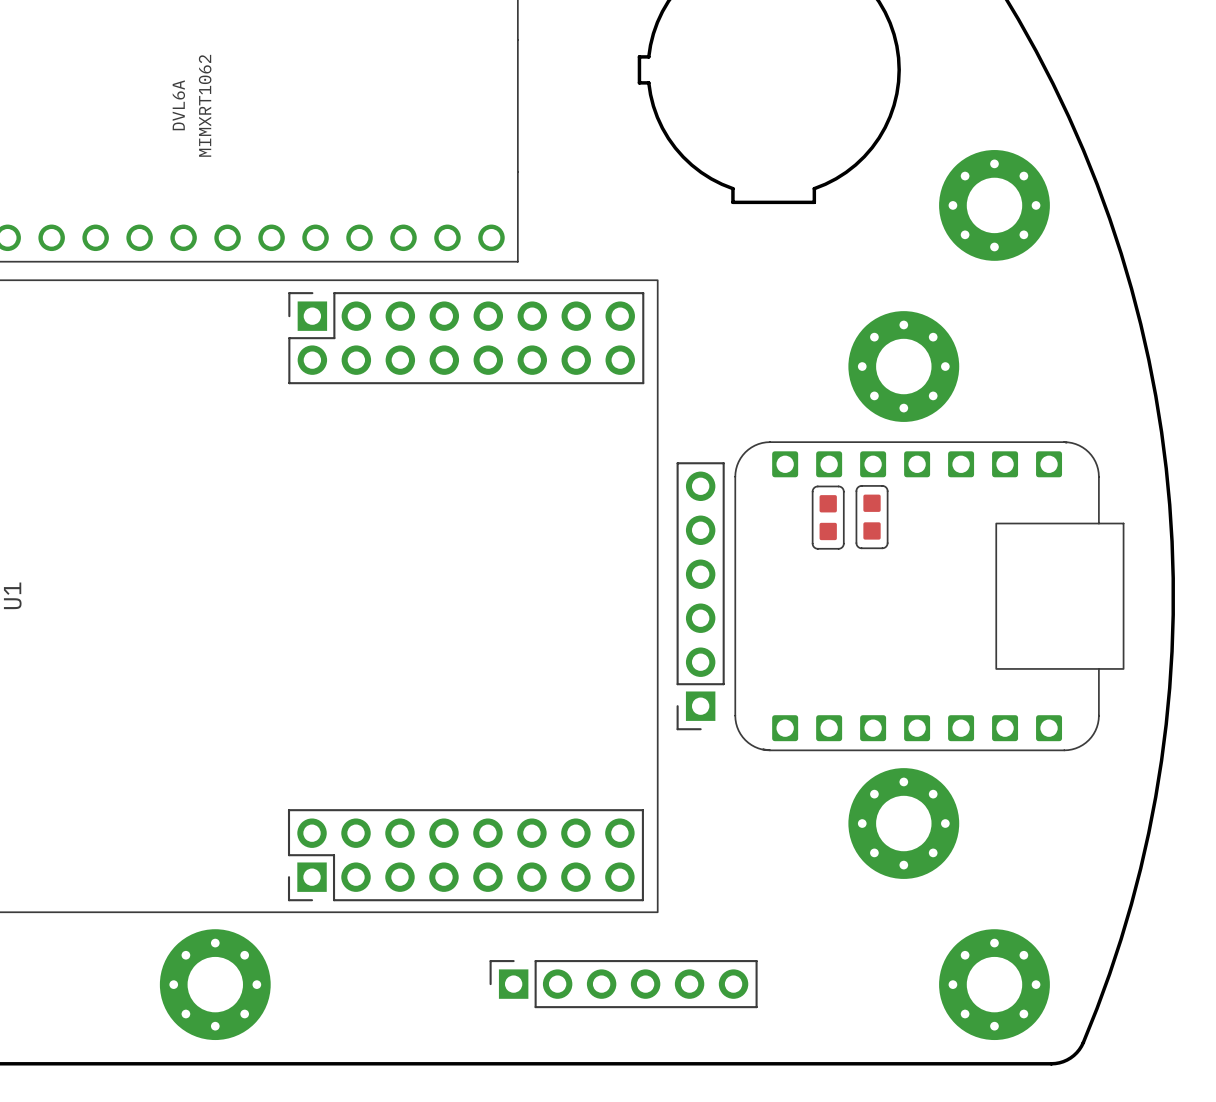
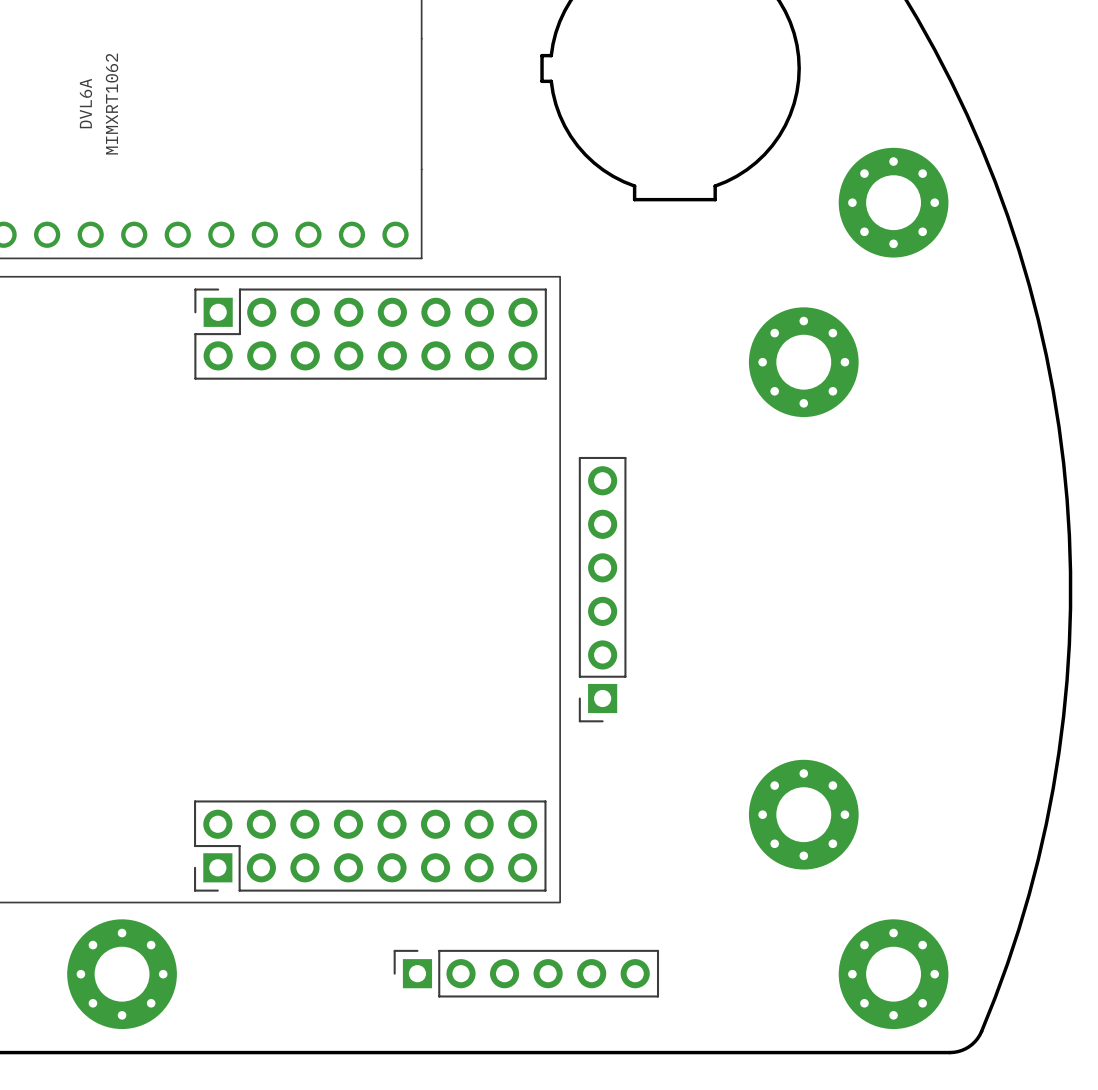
part: (828, 517) -> none
part: (872, 517) -> none
part: (929, 596) -> none

